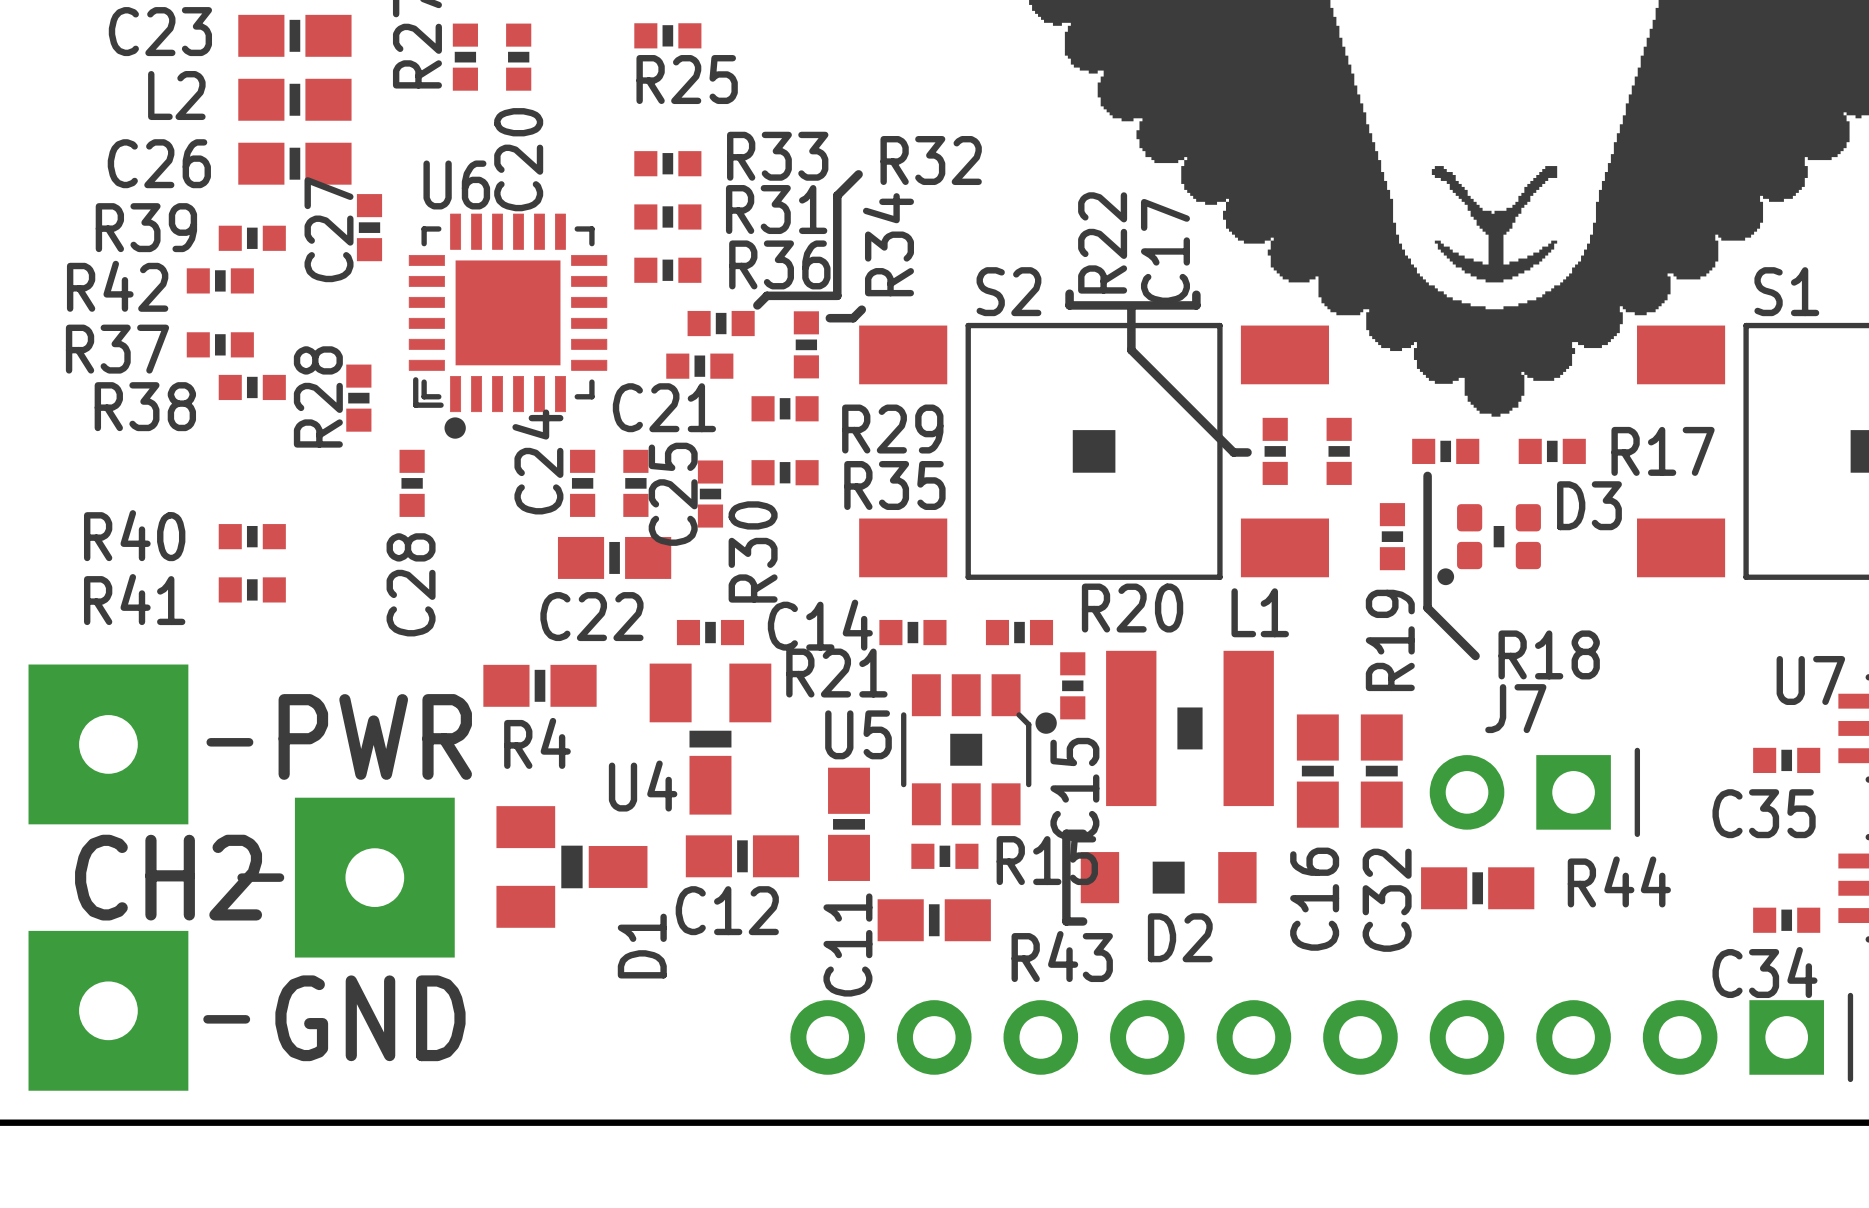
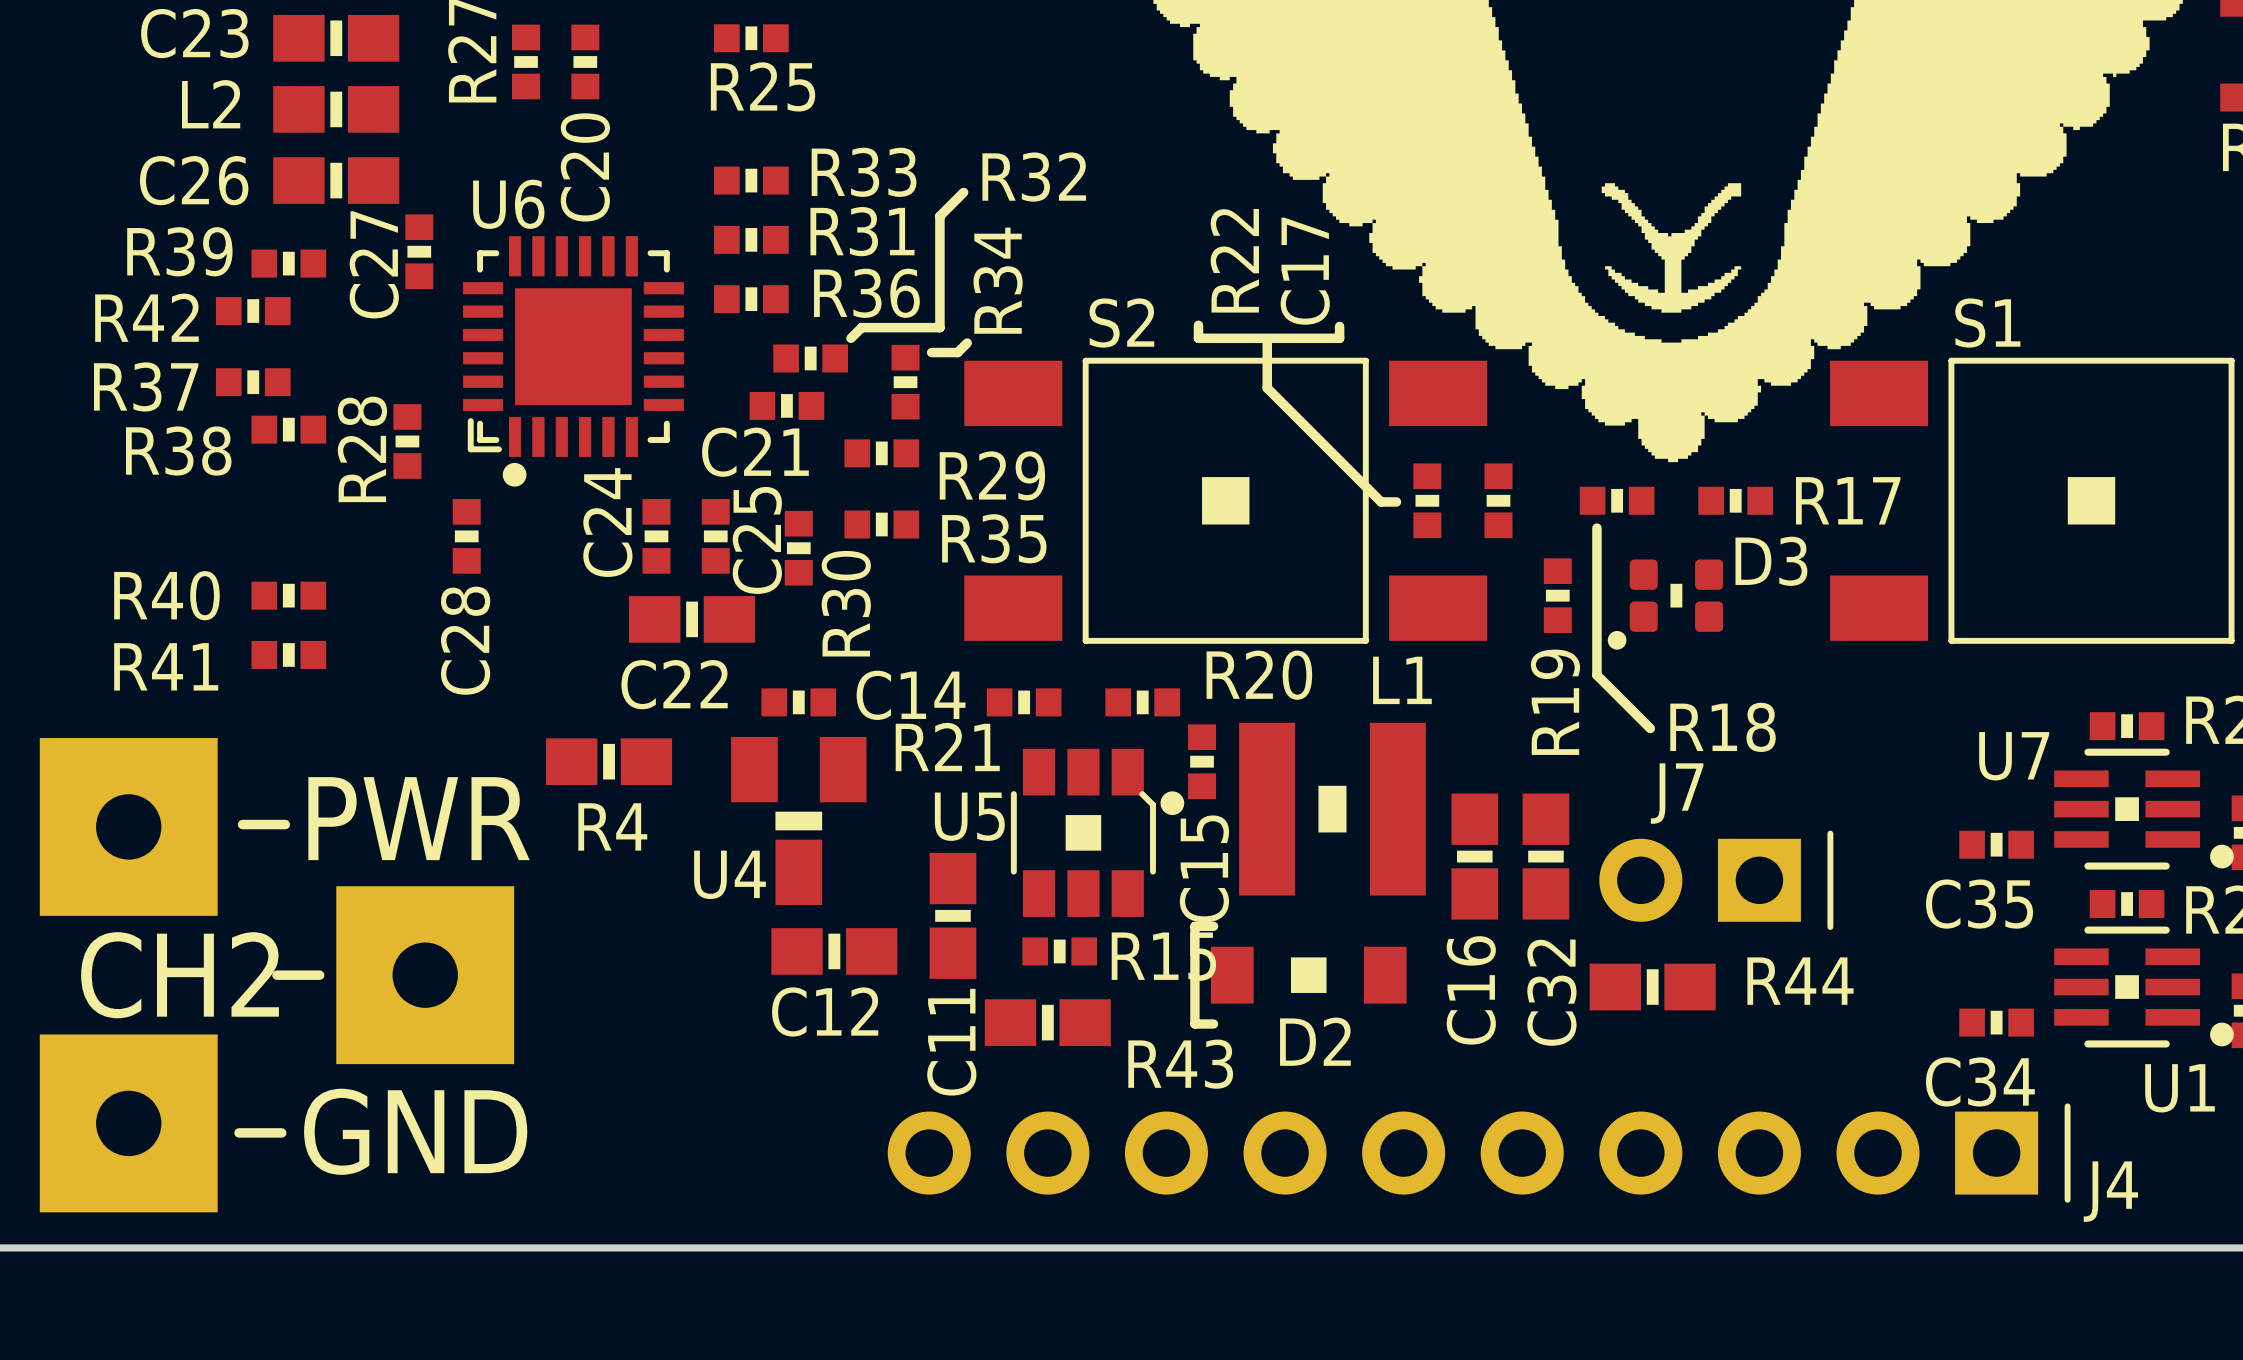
D1: (571, 866) -> none

